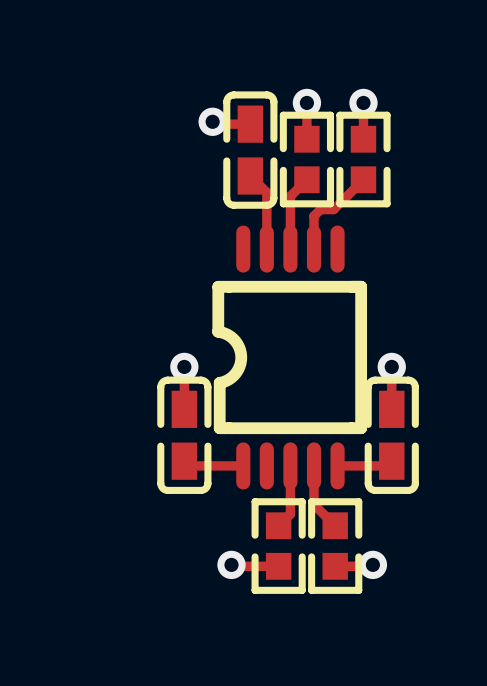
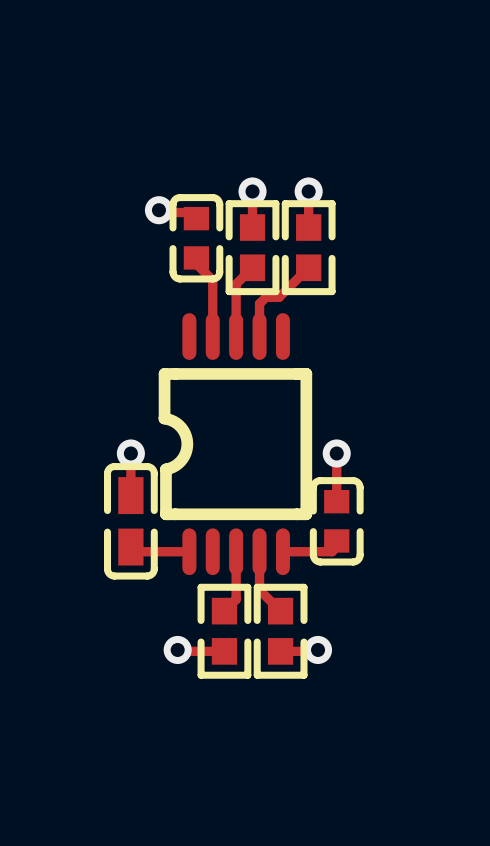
part footprint: [223, 91, 278, 209] -> [169, 194, 224, 283]
part footprint: [364, 376, 419, 494] -> [309, 477, 364, 566]

